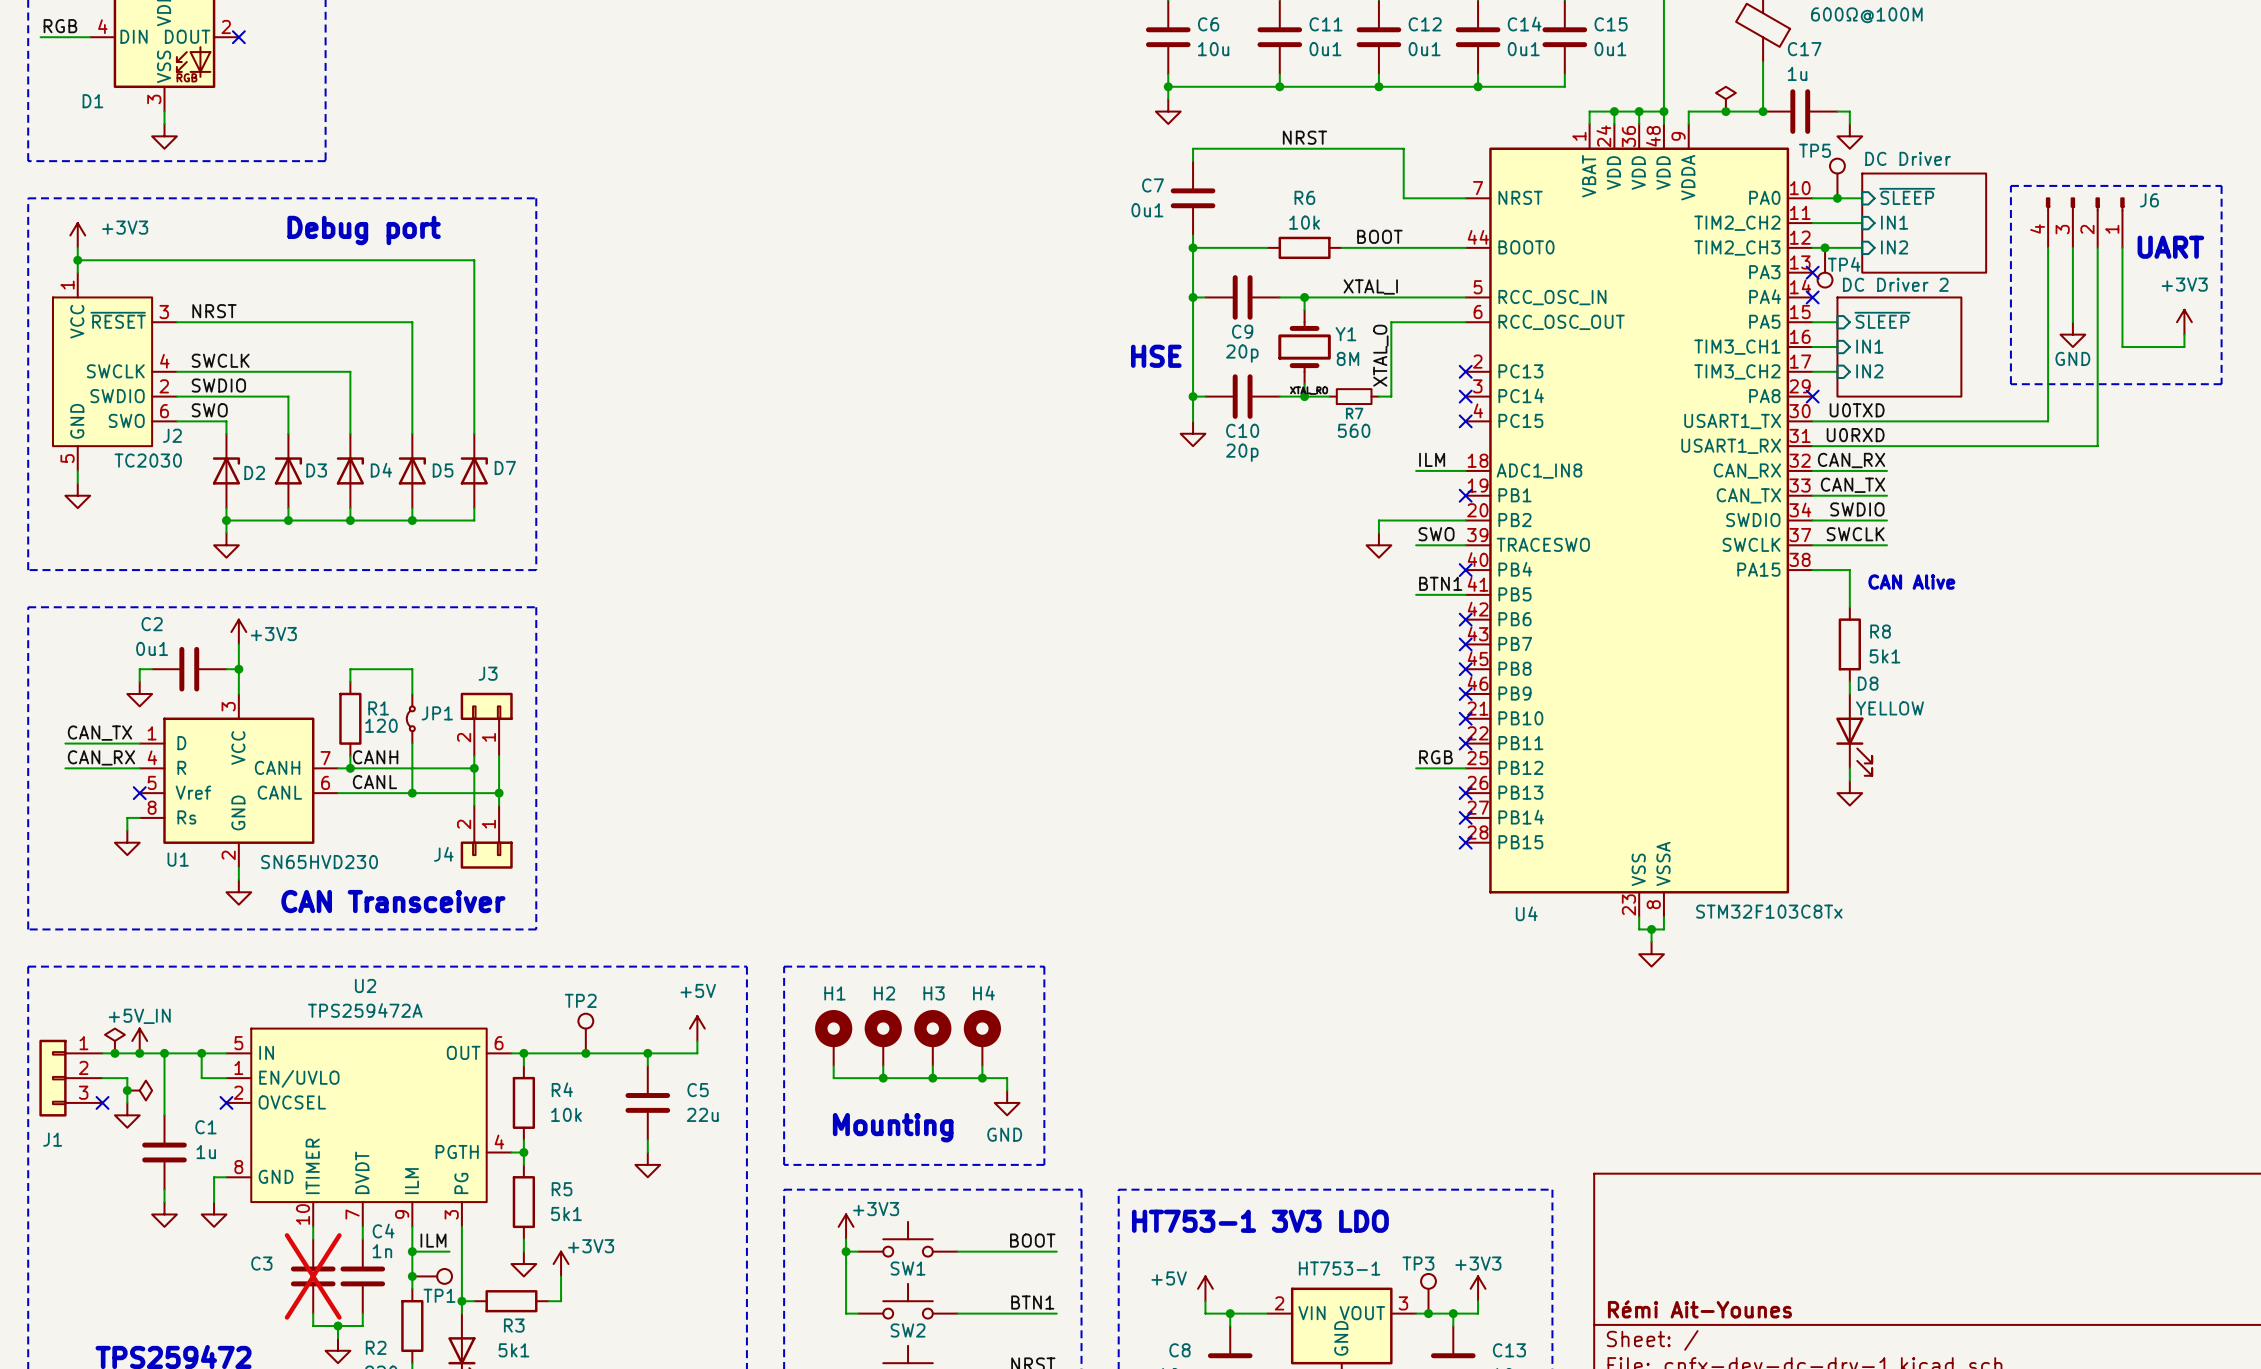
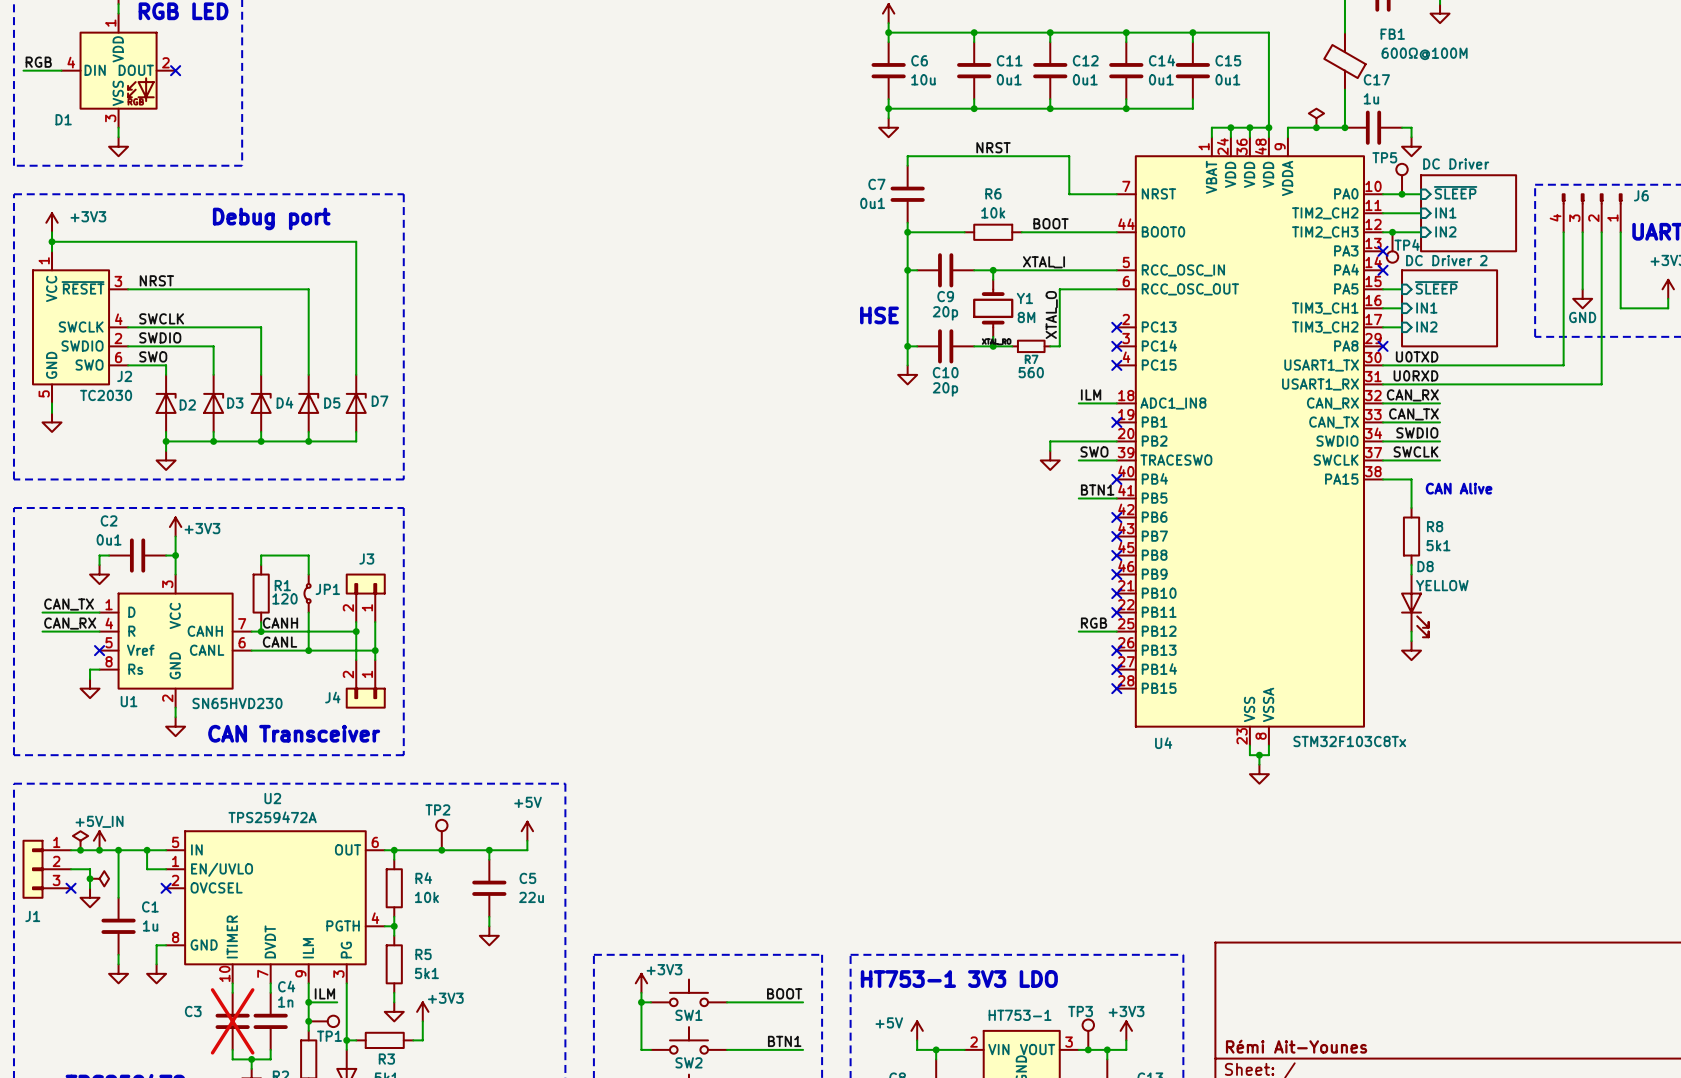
line: (784, 966) (1044, 966) (1044, 1164) (784, 1164) (784, 966) -> none
H1: (833, 1037) -> none
H2: (883, 1037) -> none
H3: (932, 1037) -> none
H4: (982, 1037) -> none
wire: (833, 1065) (833, 1078) (1007, 1078) (1007, 1090) -> none
wire: (883, 1065) (883, 1078) -> none
wire: (932, 1065) (932, 1078) -> none
wire: (982, 1065) (982, 1078) -> none
junction: (883, 1078) -> none
junction: (932, 1078) -> none
junction: (982, 1078) -> none
power symbol: GND (1007, 1102) -> none
text: Mounting (893, 1127) -> none

